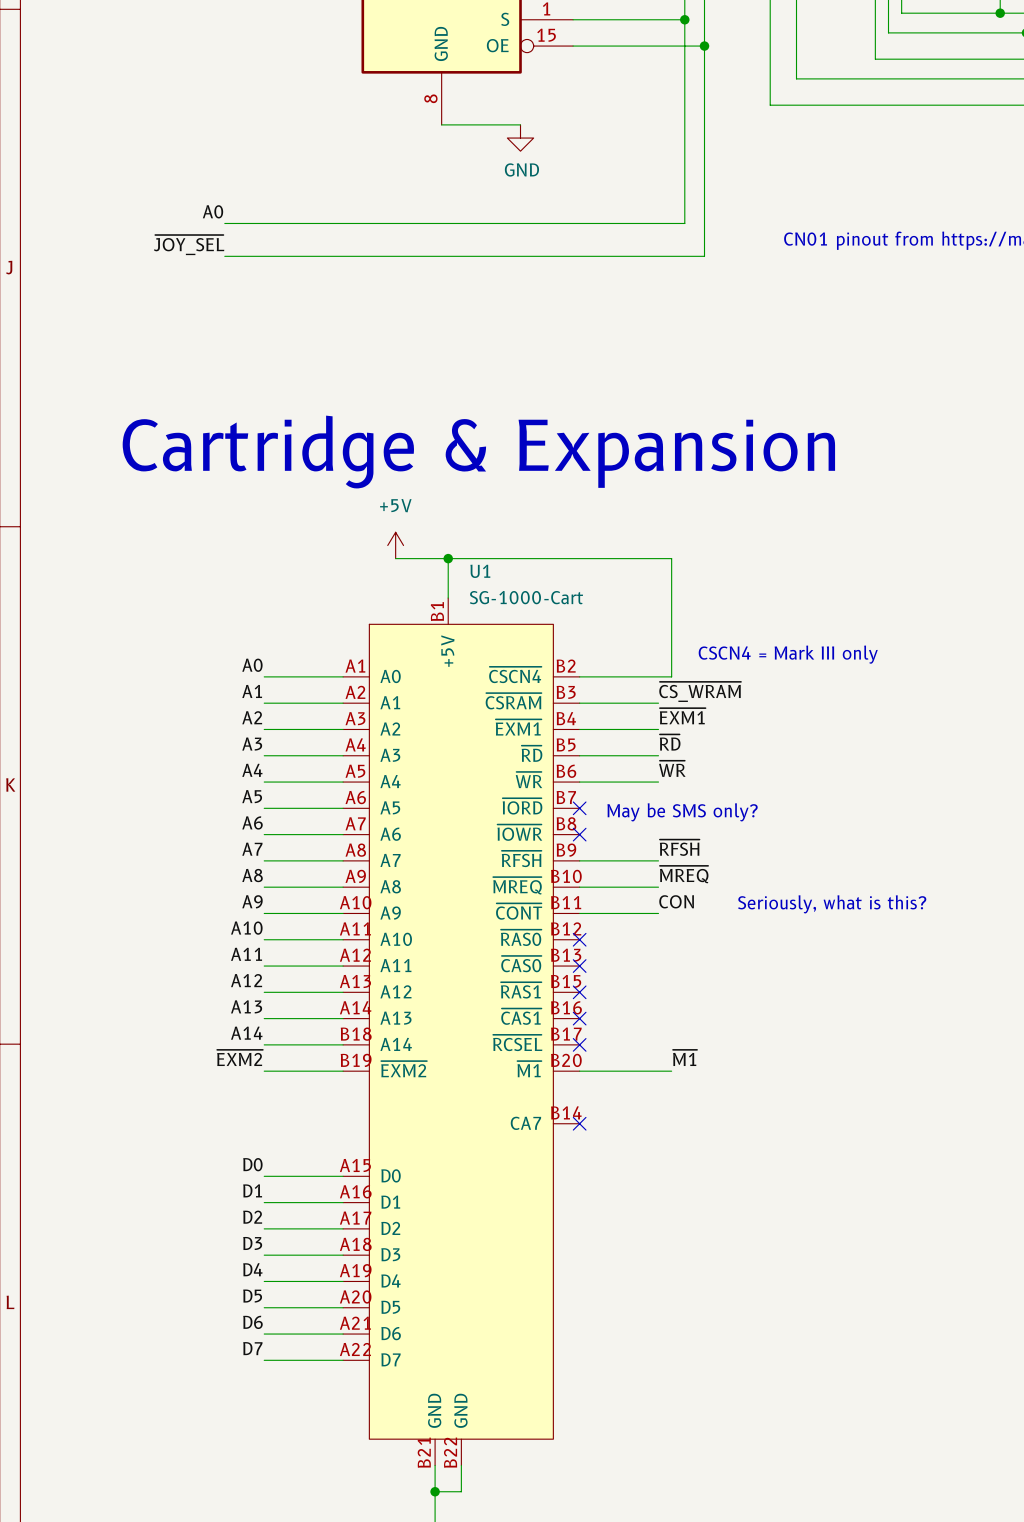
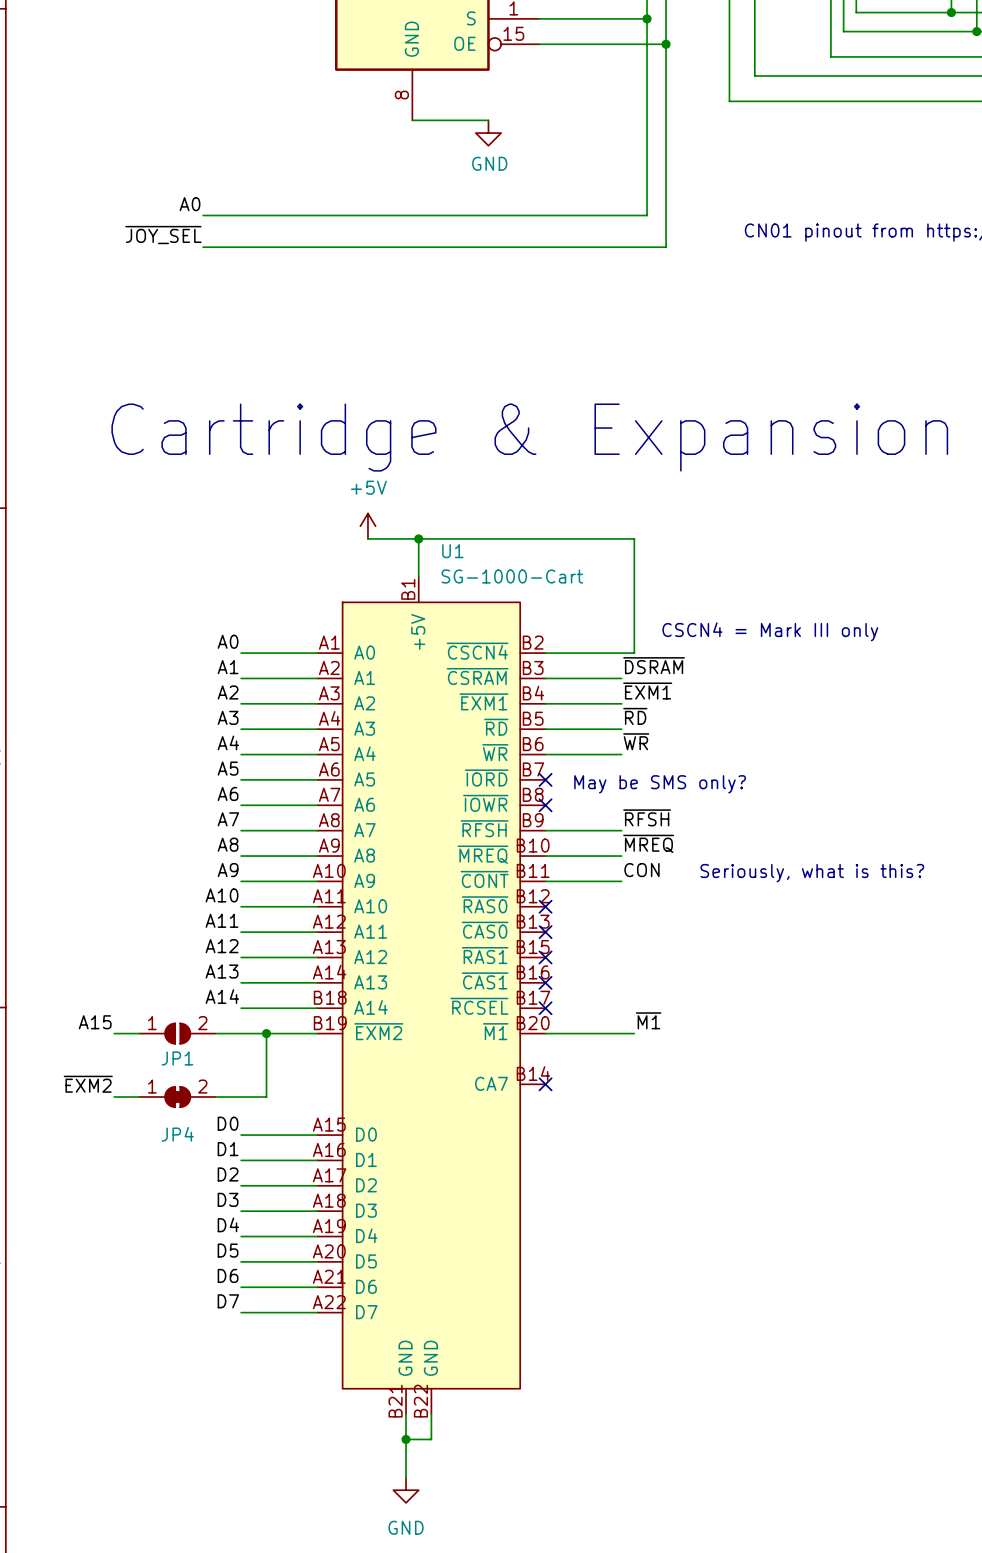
label: ~{CS_WRAM} (700, 691) -> ~{DSRAM} (654, 665)
label position: ~{EXM2} (240, 1057) -> ~{EXM2} (88, 1084)
label: none -> A15 (95, 1022)
wire: none -> (114, 1033) (139, 1033)
JP1: none -> (177, 1033)
wire: none -> (215, 1033) (241, 1033)
wire: none -> (266, 1033) (266, 1097) (215, 1097)
junction: none -> (266, 1033)
wire: none -> (114, 1097) (139, 1097)
JP4: none -> (177, 1097)

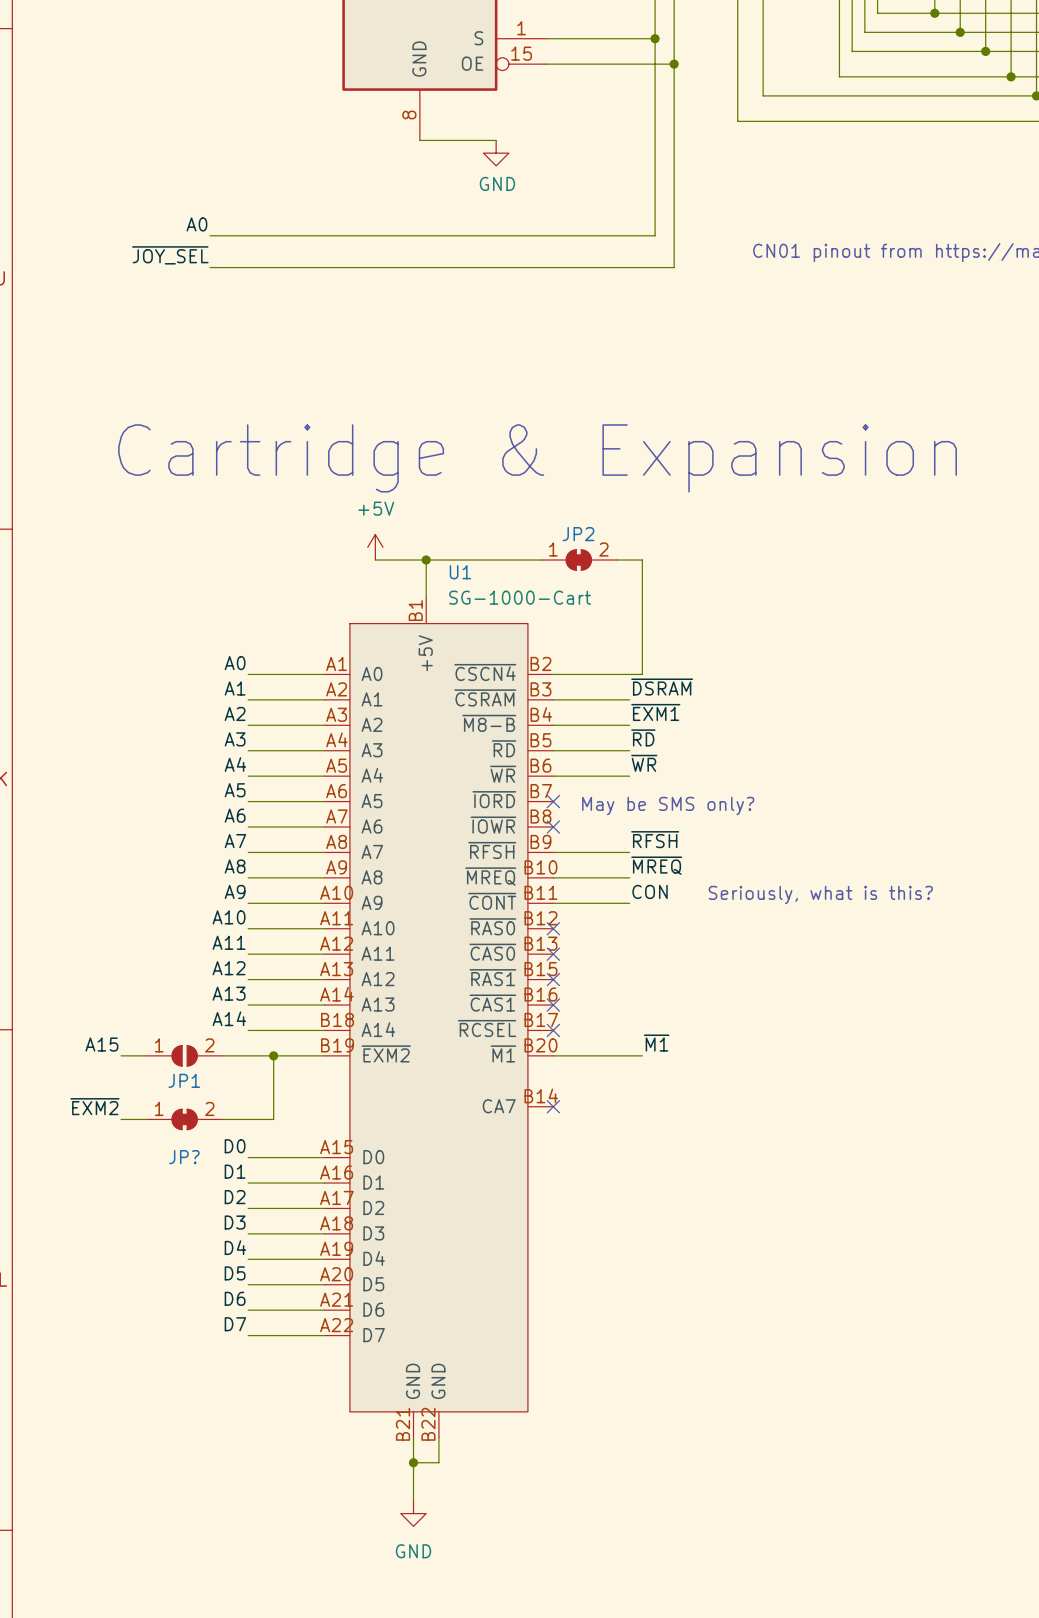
JP2: none -> (578, 560)
text: CSCN4 = Mark III only (770, 631) -> none
U1 pin name: ~{EXM1} (483, 701) -> ~{M8-B} (489, 723)
JP4 name: JP4 (177, 1134) -> JP? (184, 1157)

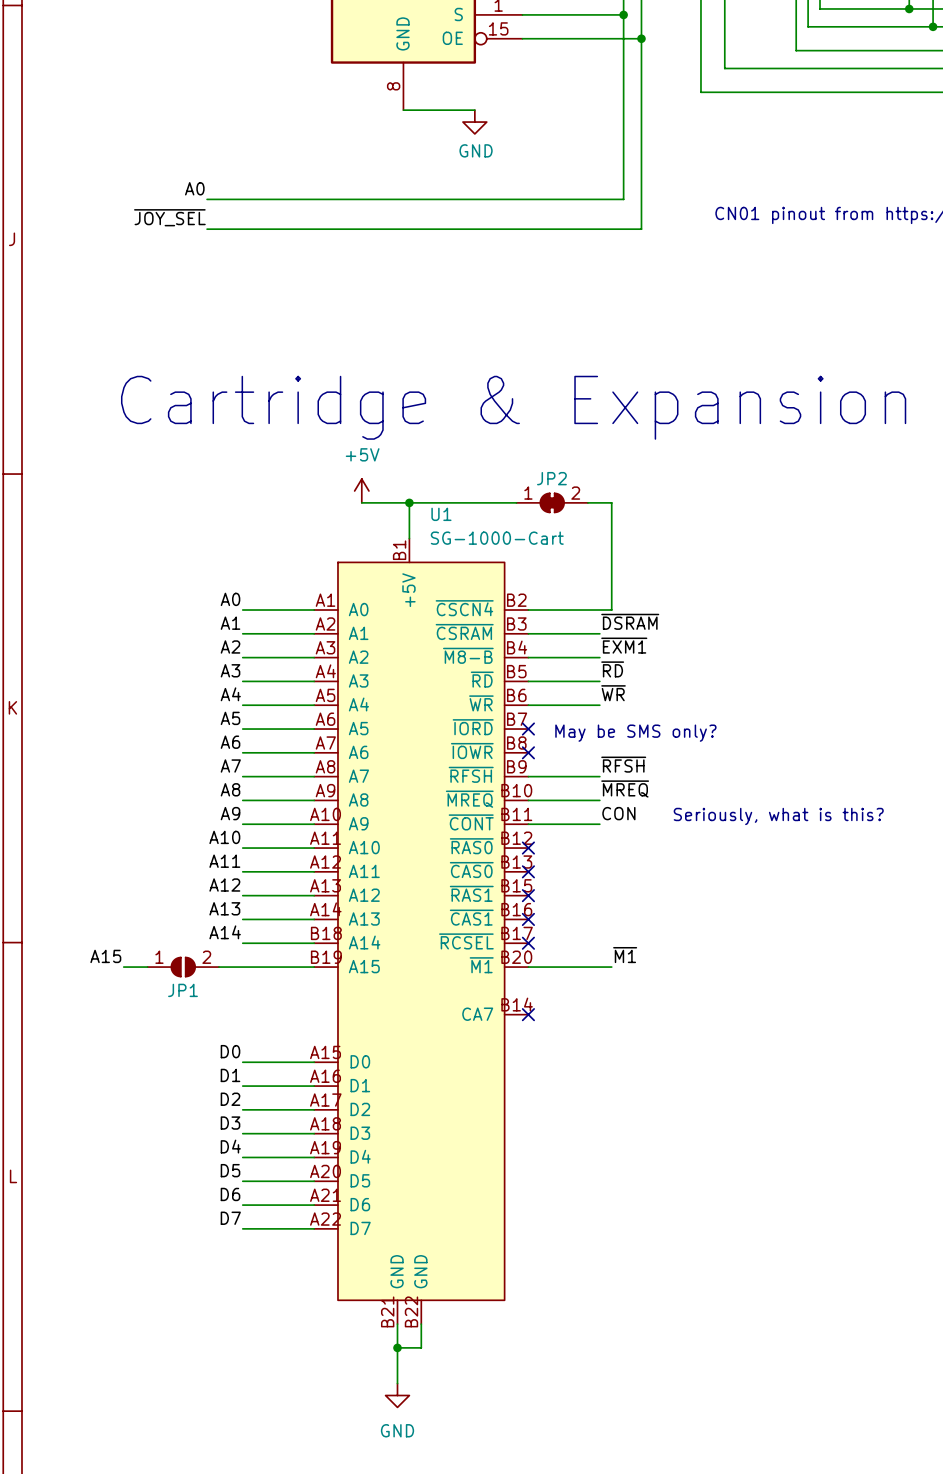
U1 pin name: ~{EXM2} (386, 1053) -> A15 (364, 966)
wire: (273, 1055) (273, 1119) (222, 1119) -> none
junction: (273, 1055) -> none
label: ~{EXM2} (94, 1106) -> none
wire: (121, 1119) (146, 1119) -> none
JP?: (184, 1119) -> none

